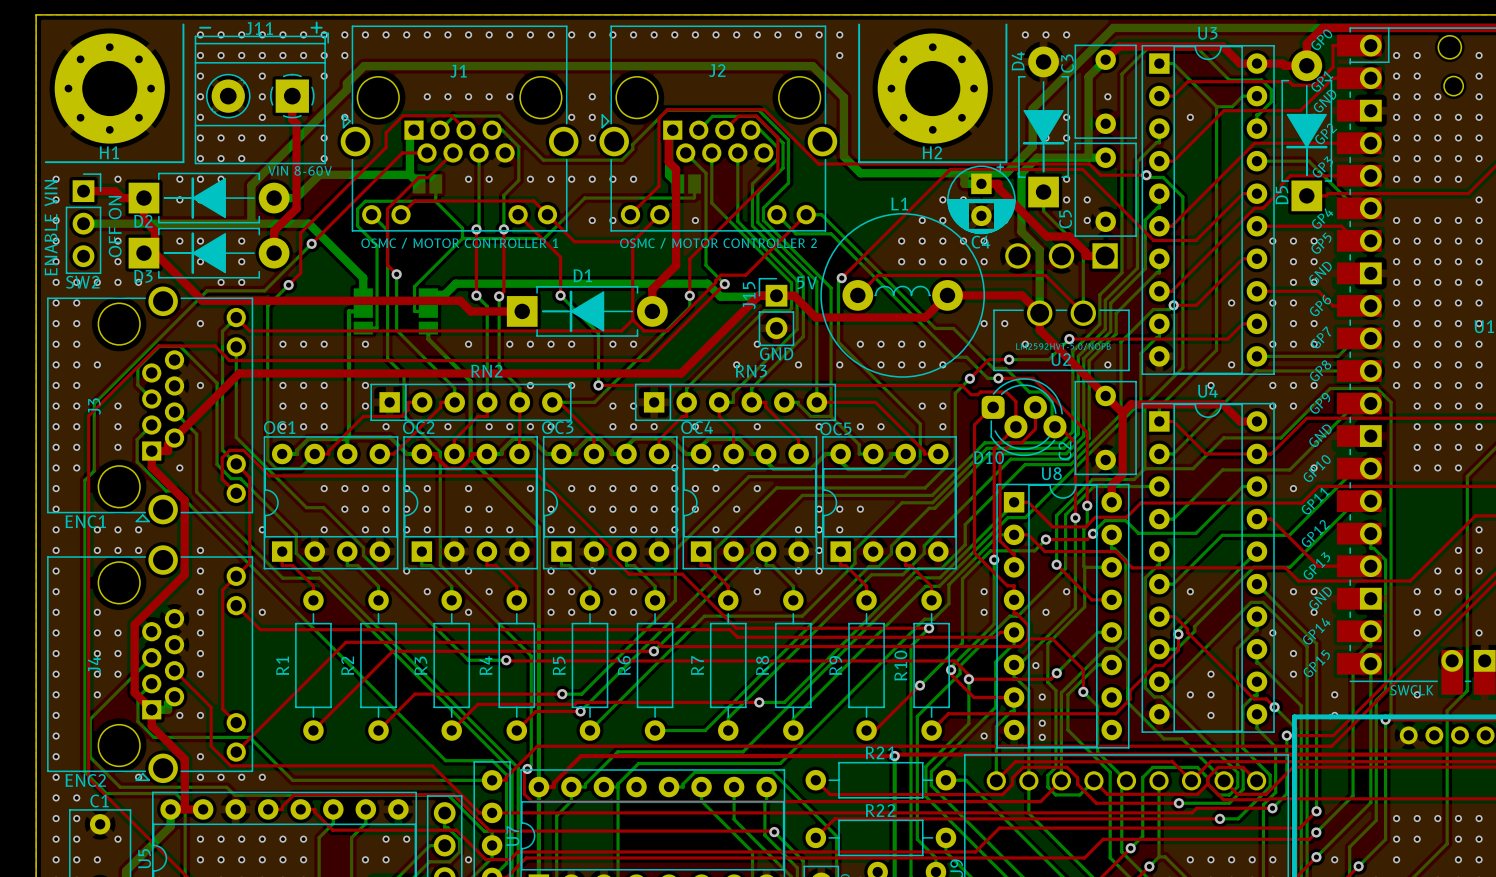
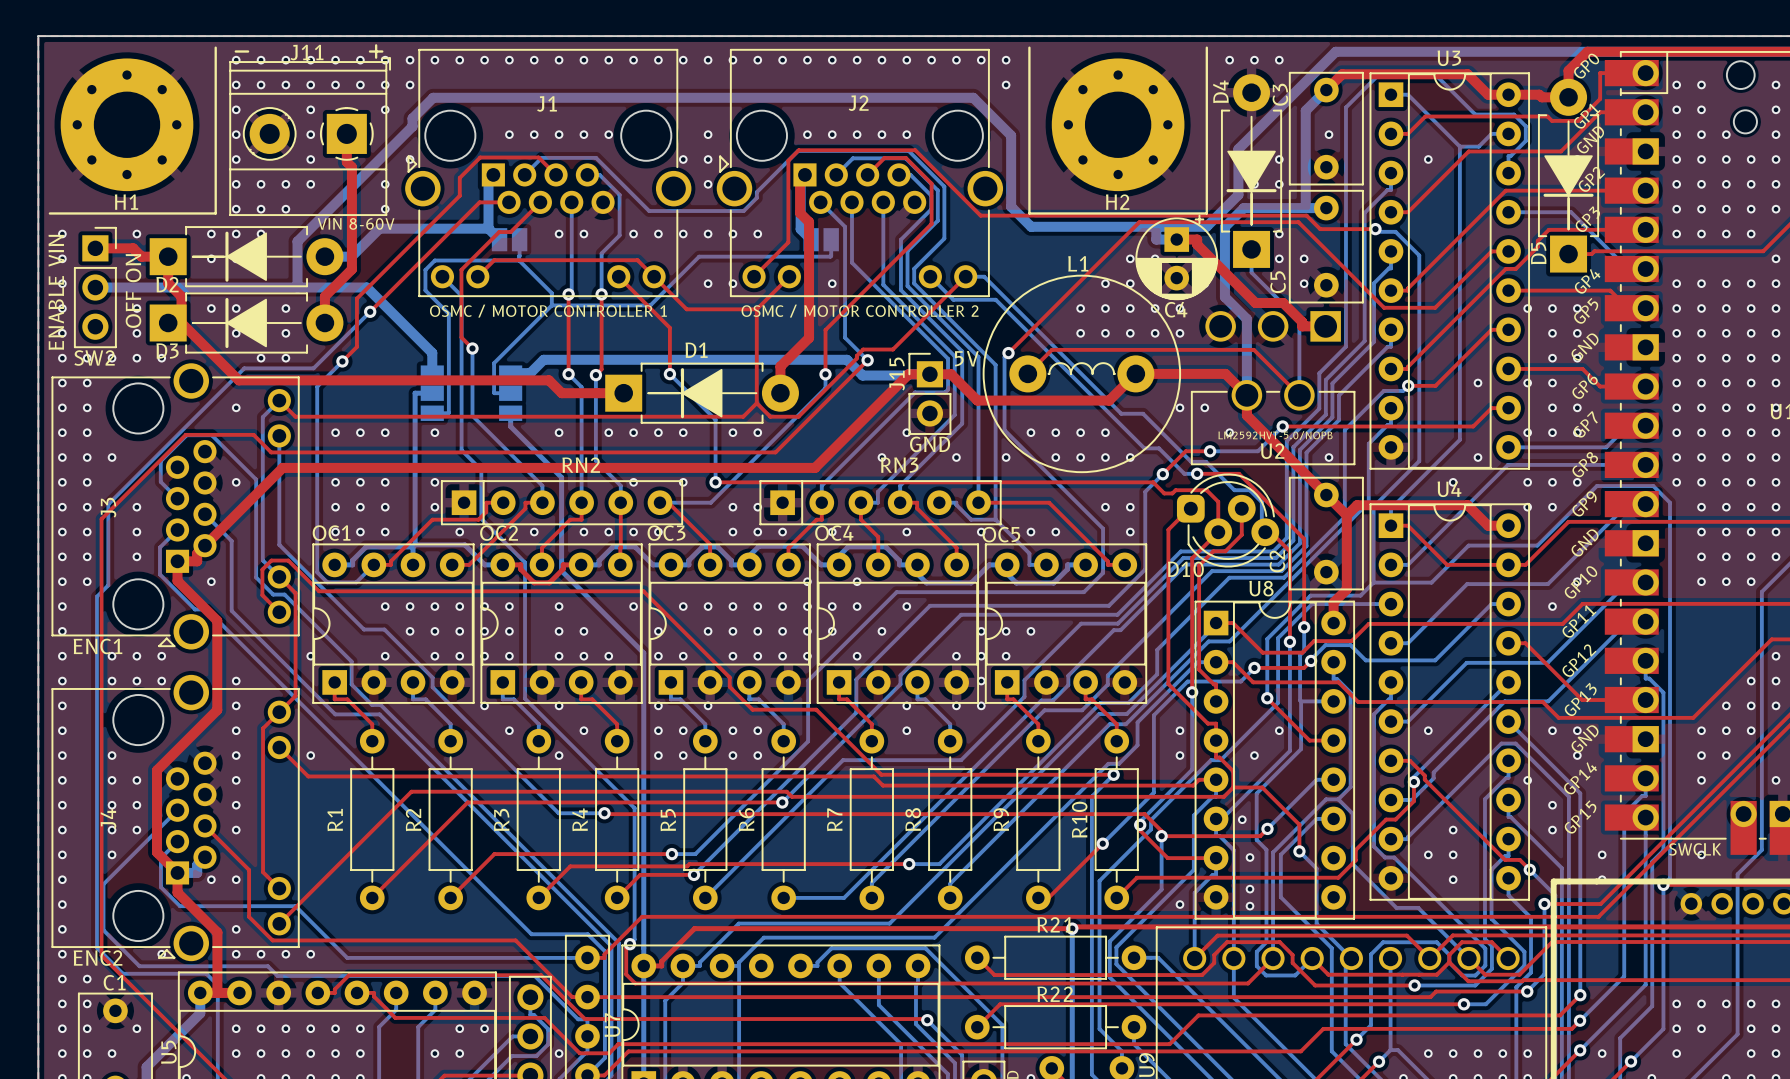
via: none -> (807, 134)
via: none -> (832, 134)
via: none -> (857, 134)
via: none -> (881, 134)
via: none -> (906, 134)

